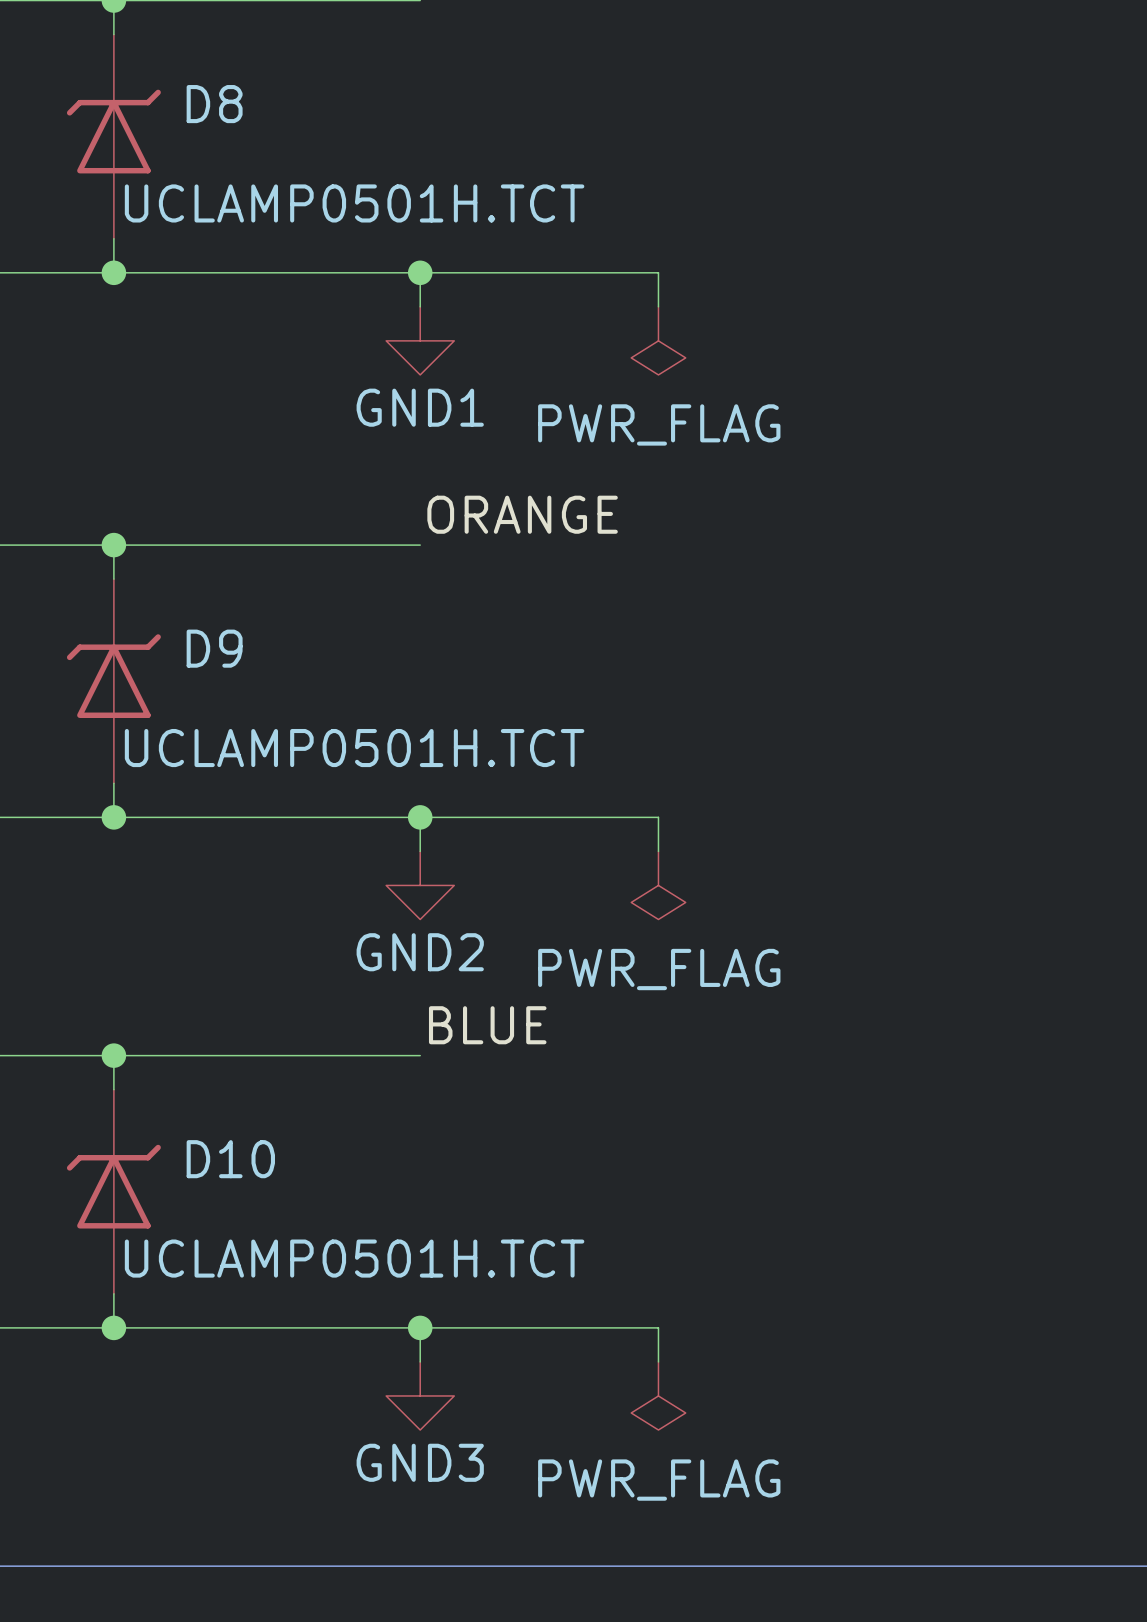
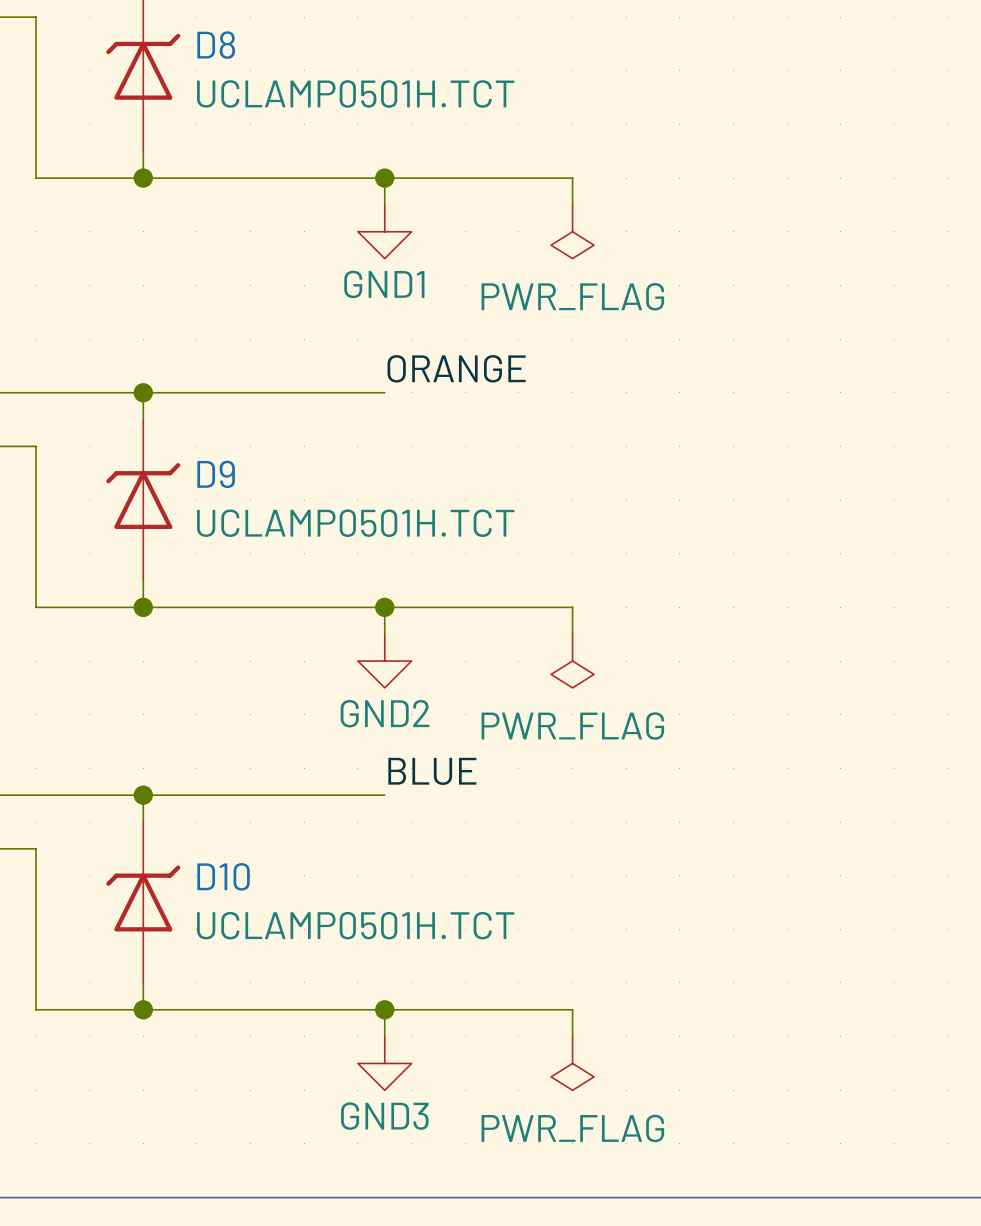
D8 value position: UCLAMP0501H.TCT (354, 203) -> UCLAMP0501H.TCT (355, 93)
D9 value position: UCLAMP0501H.TCT (354, 748) -> UCLAMP0501H.TCT (355, 523)
D10 value position: UCLAMP0501H.TCT (354, 1258) -> UCLAMP0501H.TCT (355, 925)

